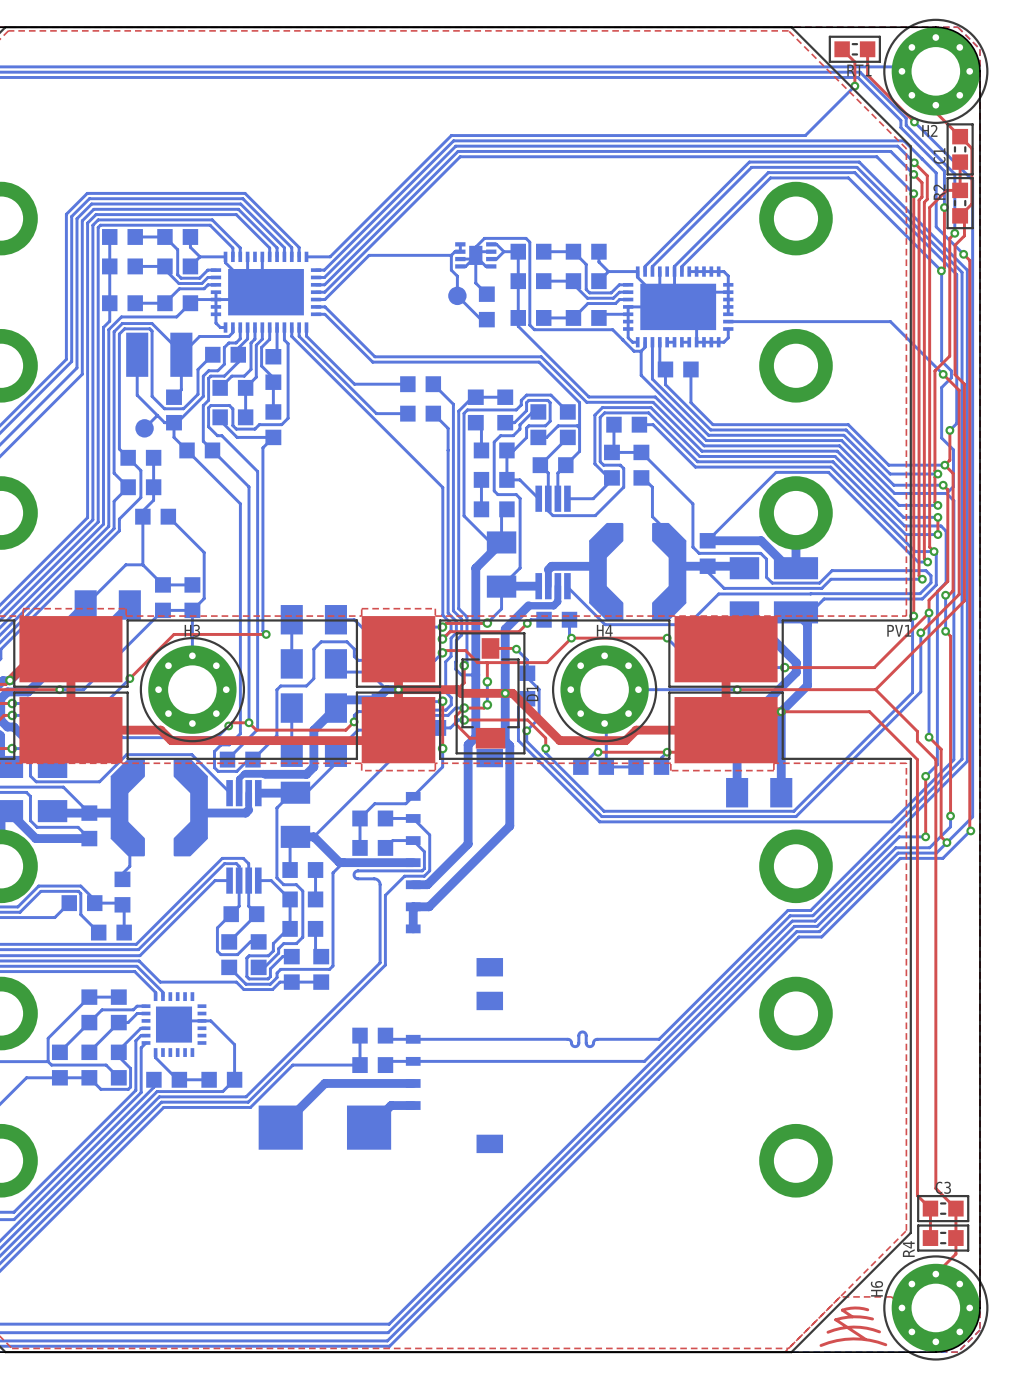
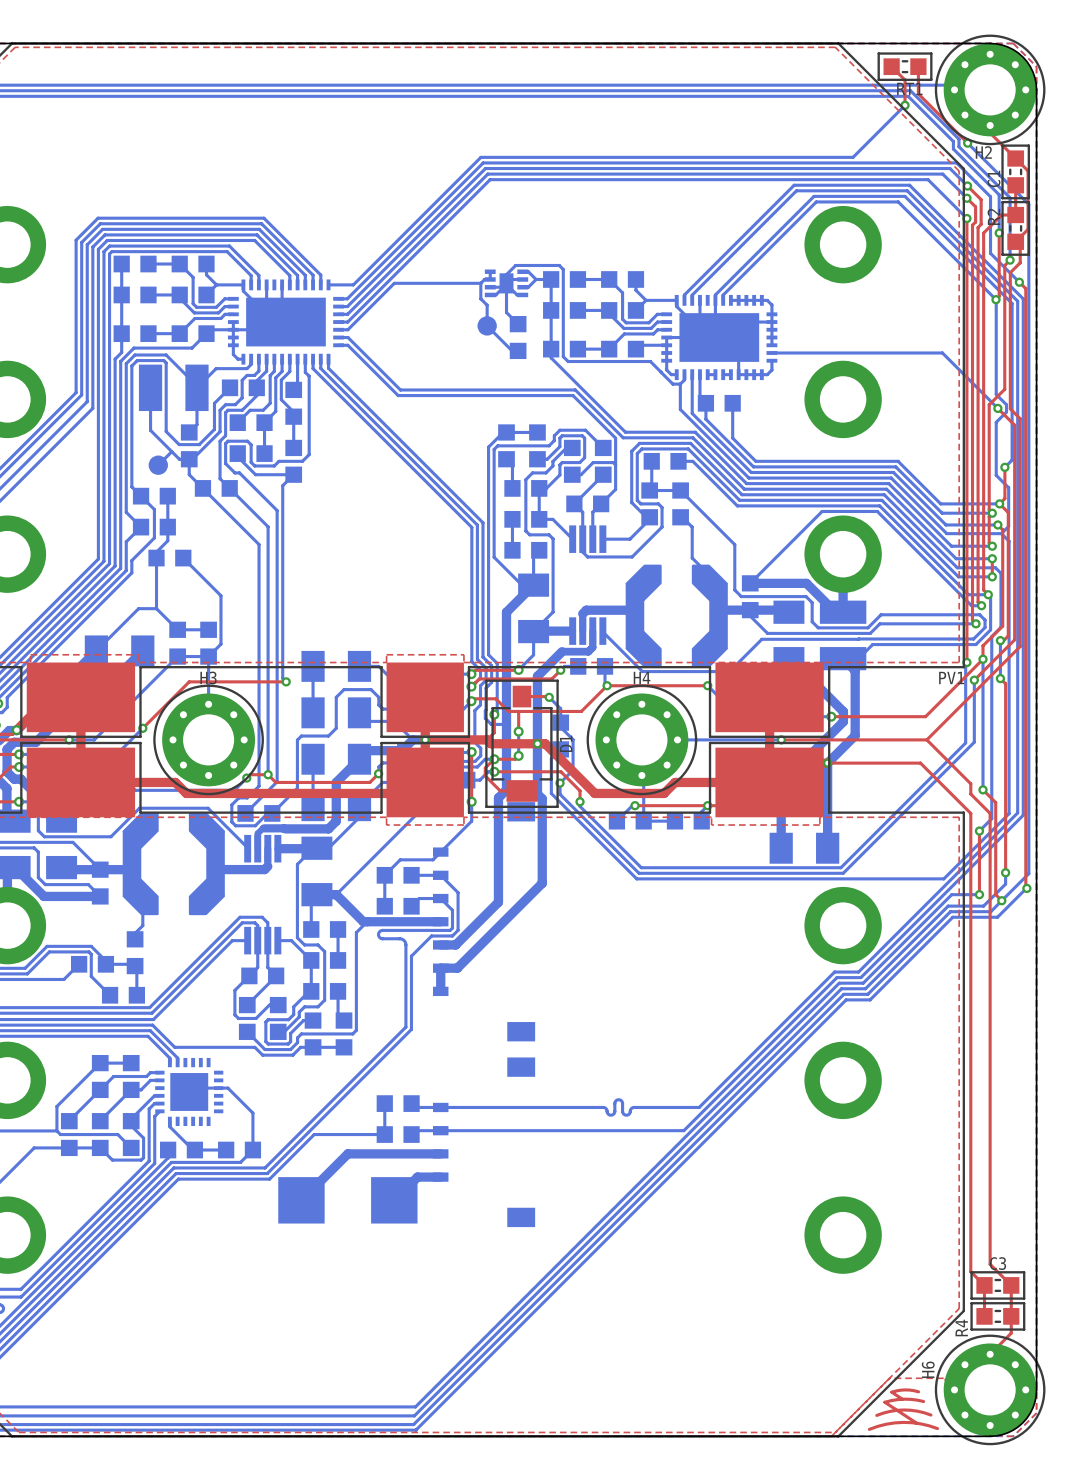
bottom track: (354, 384) (407, 384) -> none
part: (420, 384) -> none
bottom track: (433, 384) (453, 404) (453, 483) -> (378, 418) (482, 522)
bottom track: (376, 413) (407, 413) -> none
part: (420, 413) -> none
bottom track: (433, 413) (448, 428) (448, 485) -> (402, 449) (477, 525)

